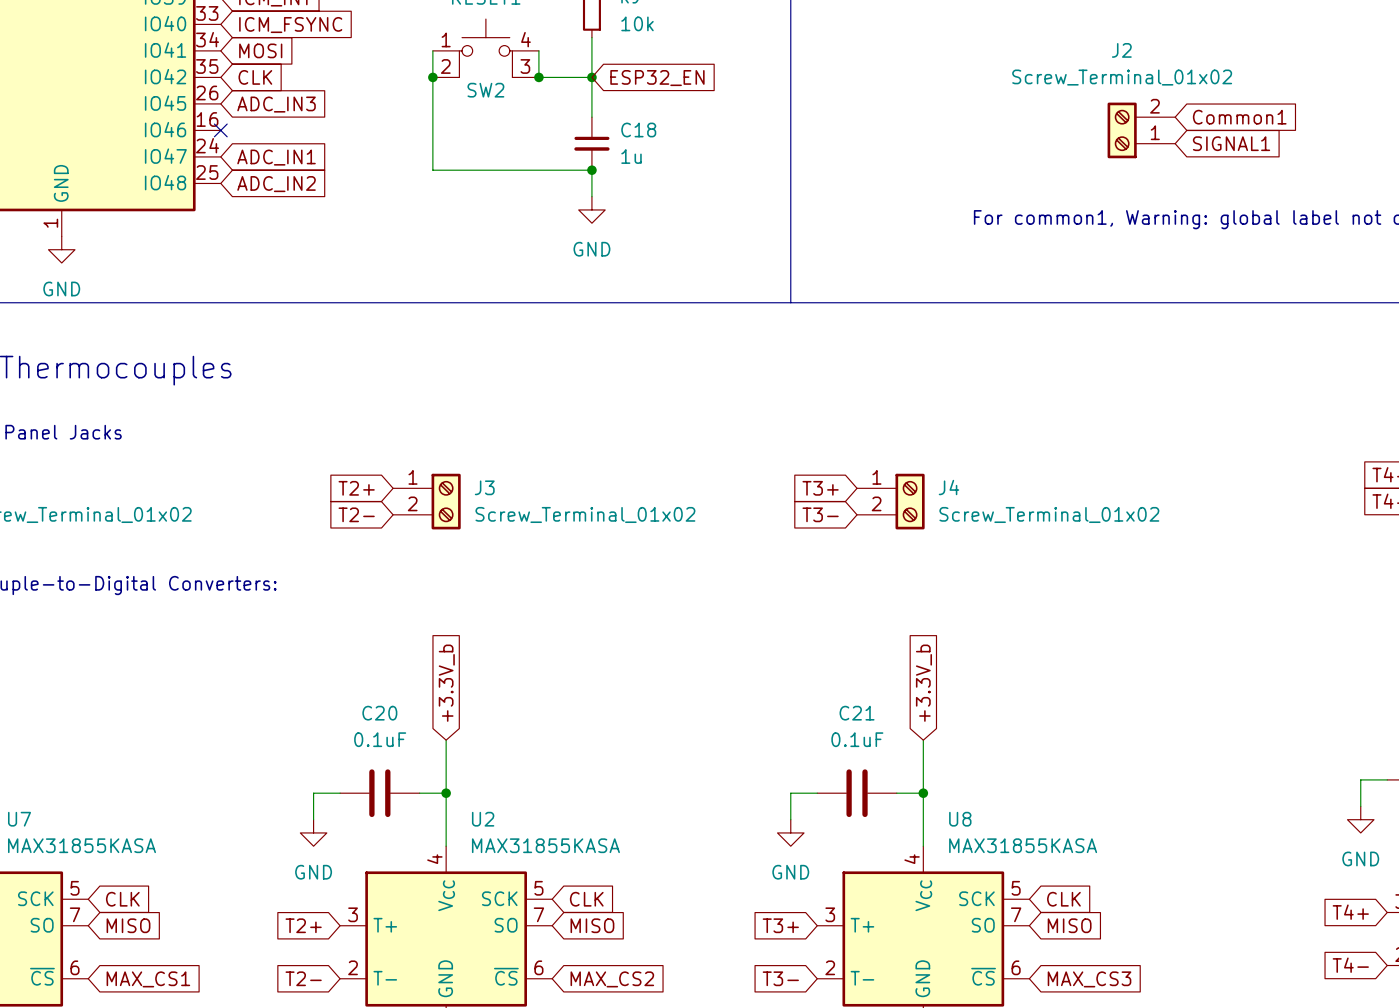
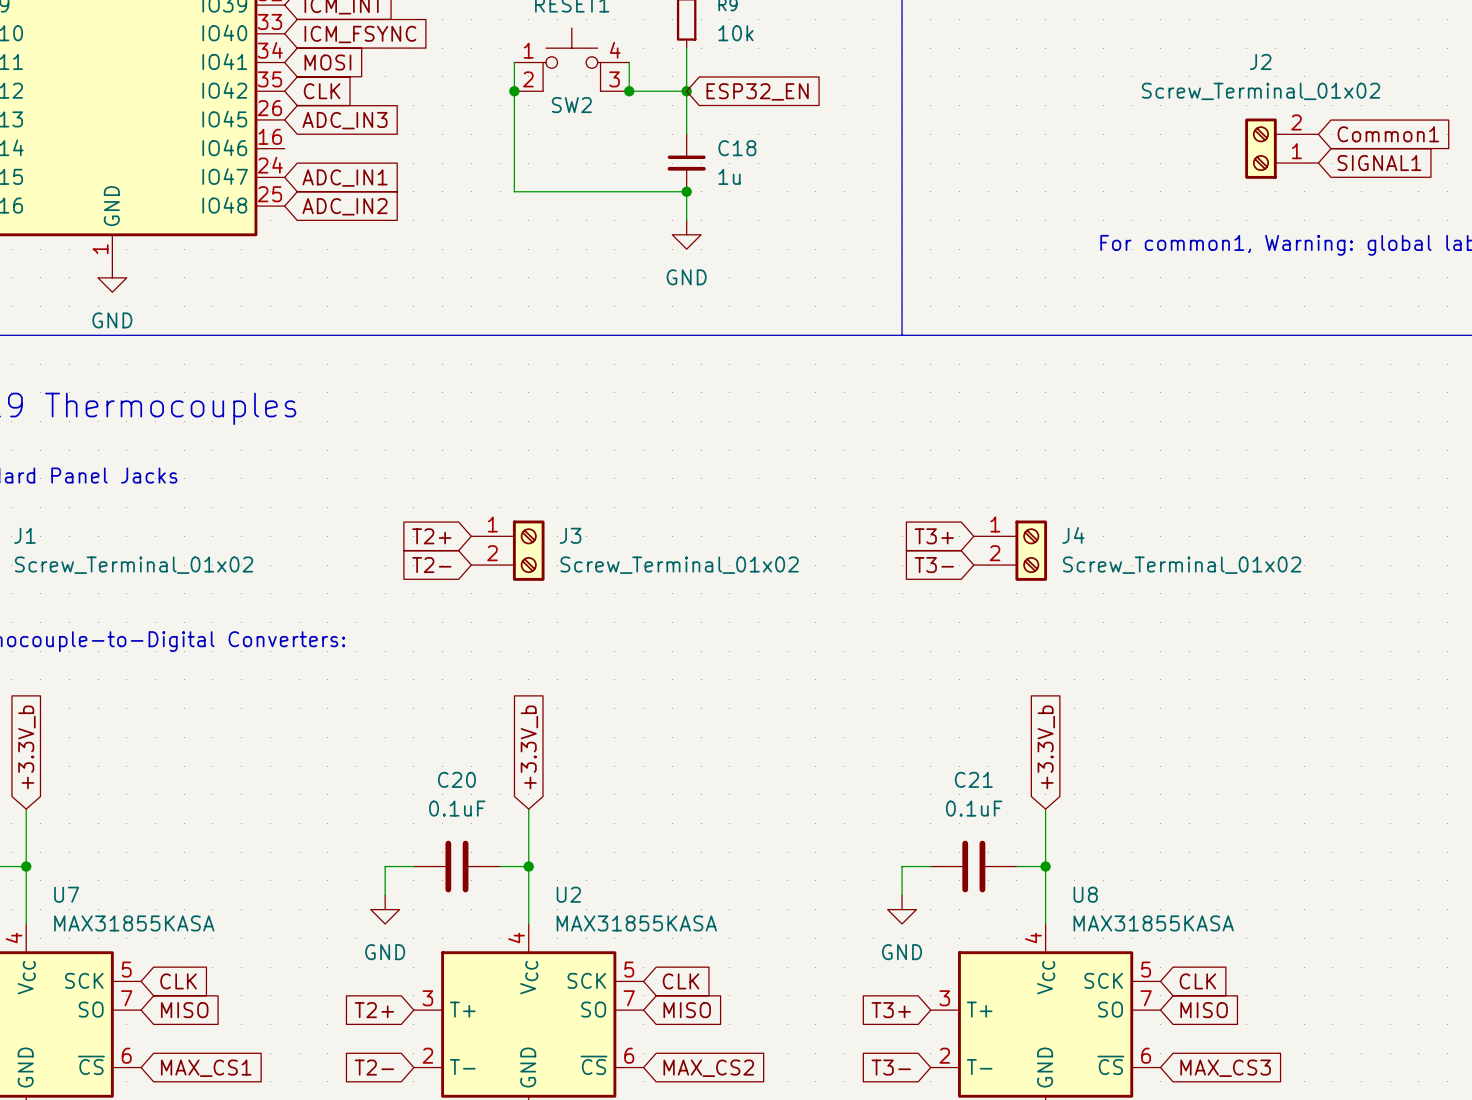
no-connect mark: (220, 130) -> none

